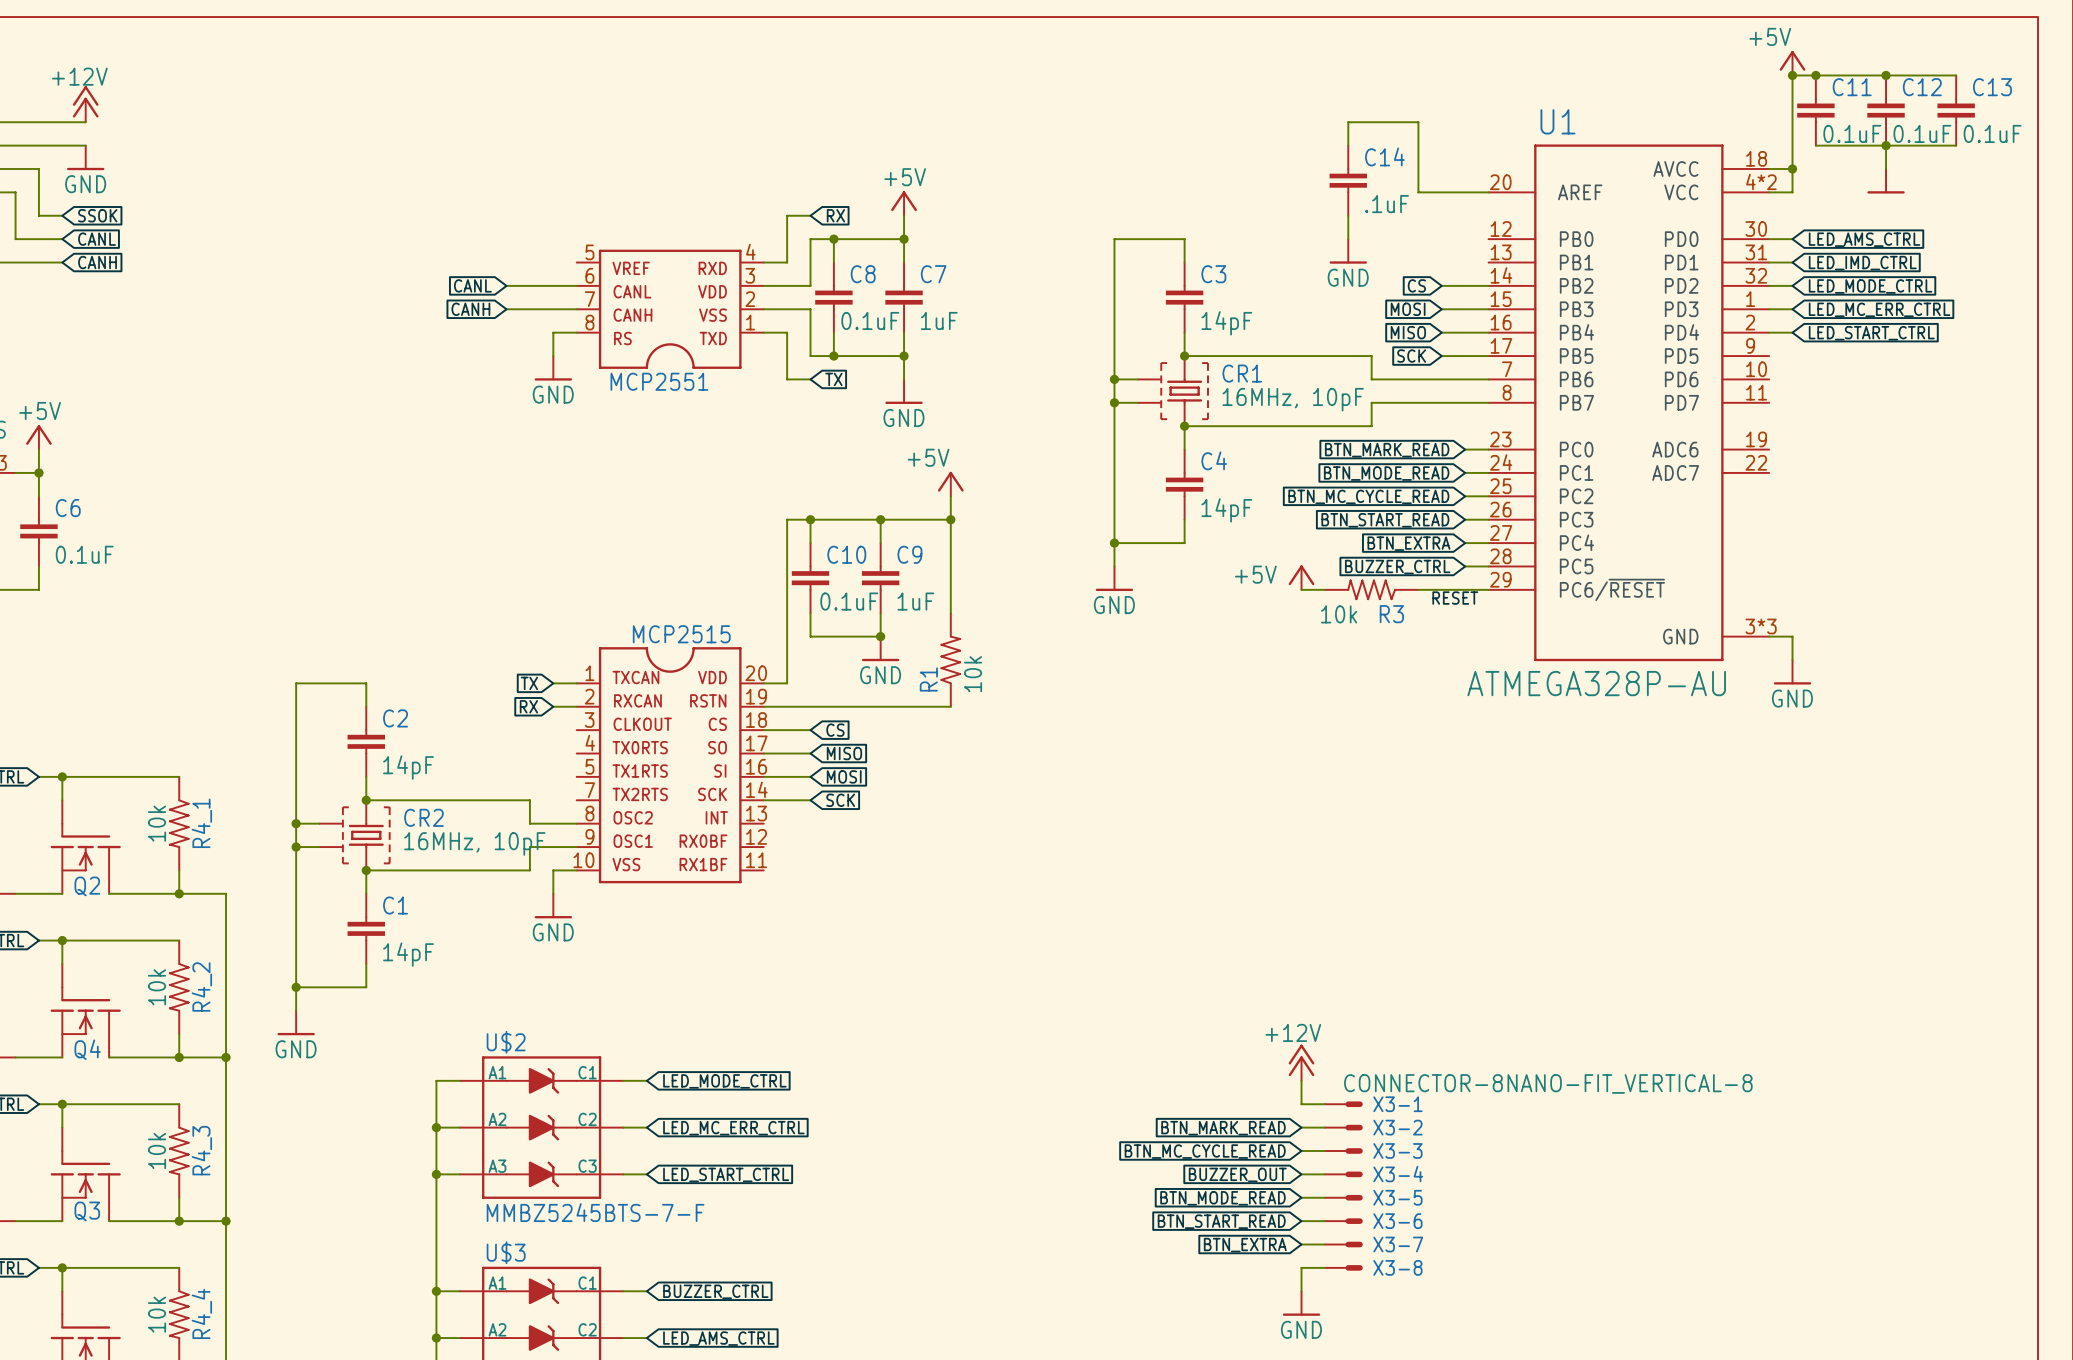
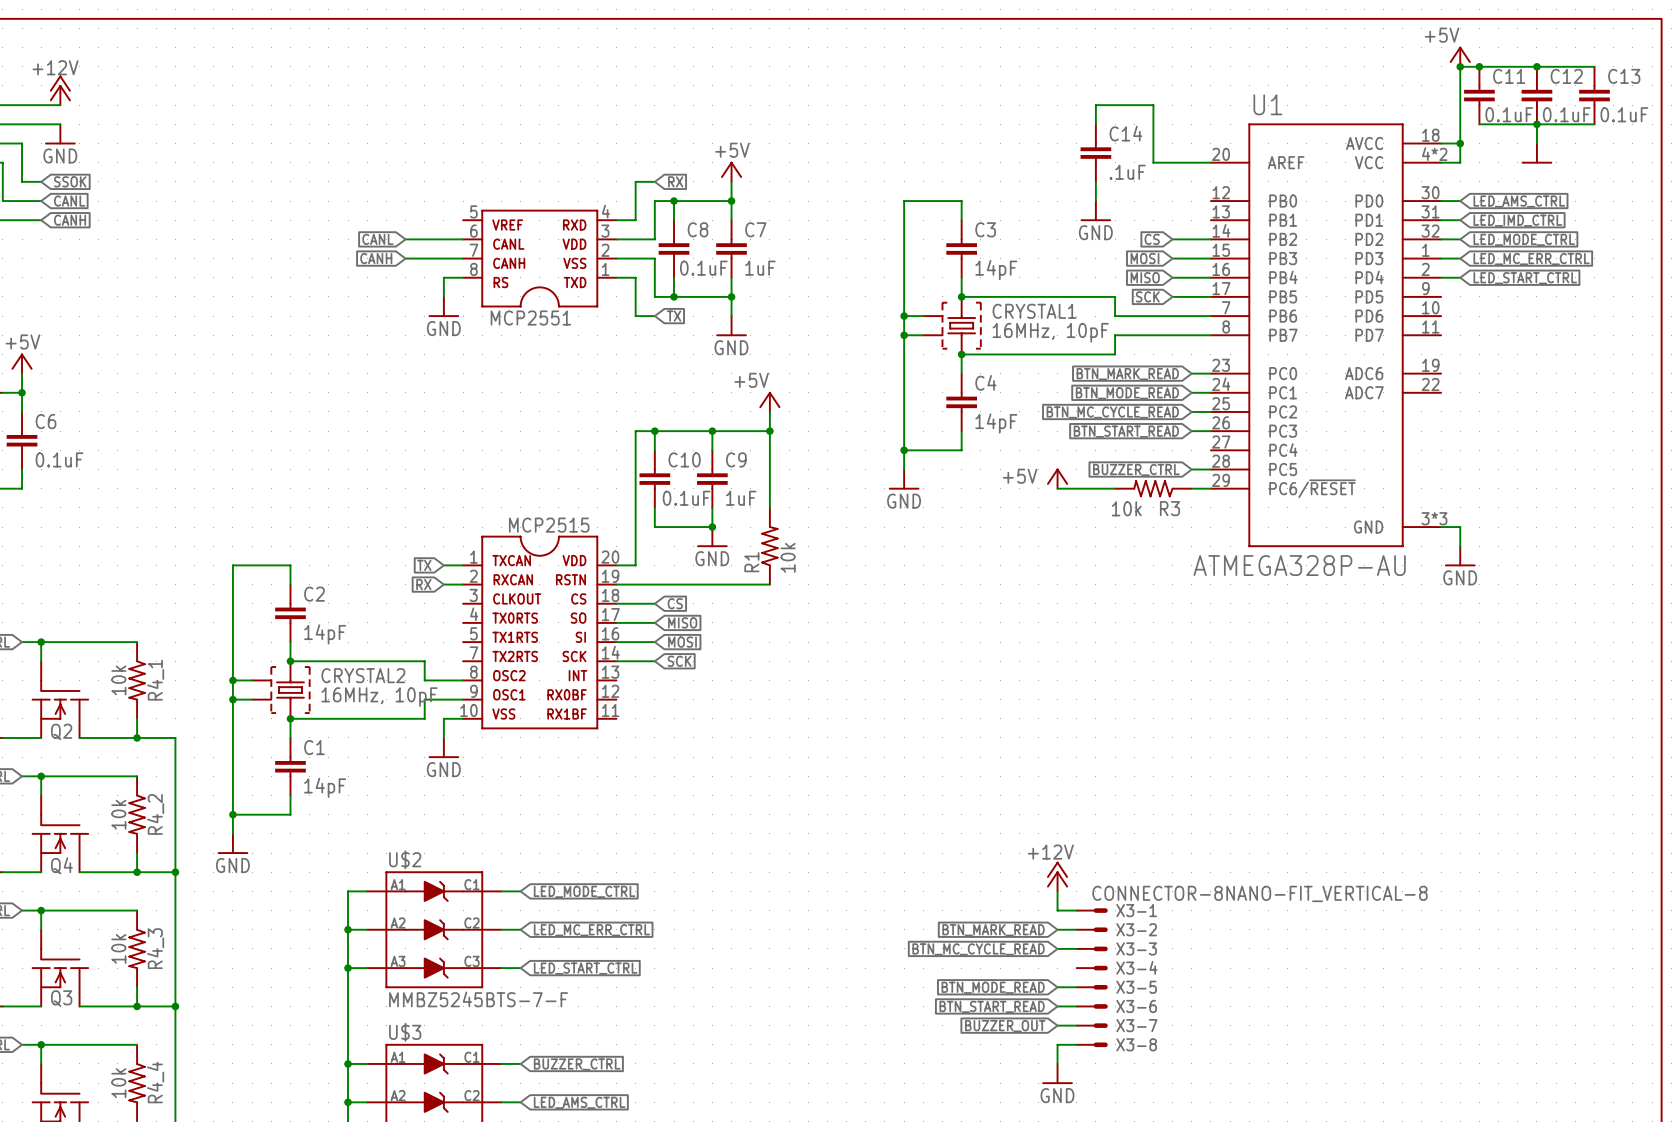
CR1 name: CR1 (1242, 373) -> CRYSTAL1 (1034, 311)
global label: BTN_EXTRA (1408, 543) -> none
wire: (1465, 543) (1488, 543) -> none
R3 position: (1371, 589) -> (1153, 488)
label: RESET (1455, 598) -> none
CR2 name: CR2 (423, 817) -> CRYSTAL2 (363, 675)
global label: BUZZER_OUT (1237, 1174) -> none
wire: (1301, 1174) (1324, 1174) -> none
global label: BTN_EXTRA (1245, 1245) -> BUZZER_OUT (1005, 1026)

